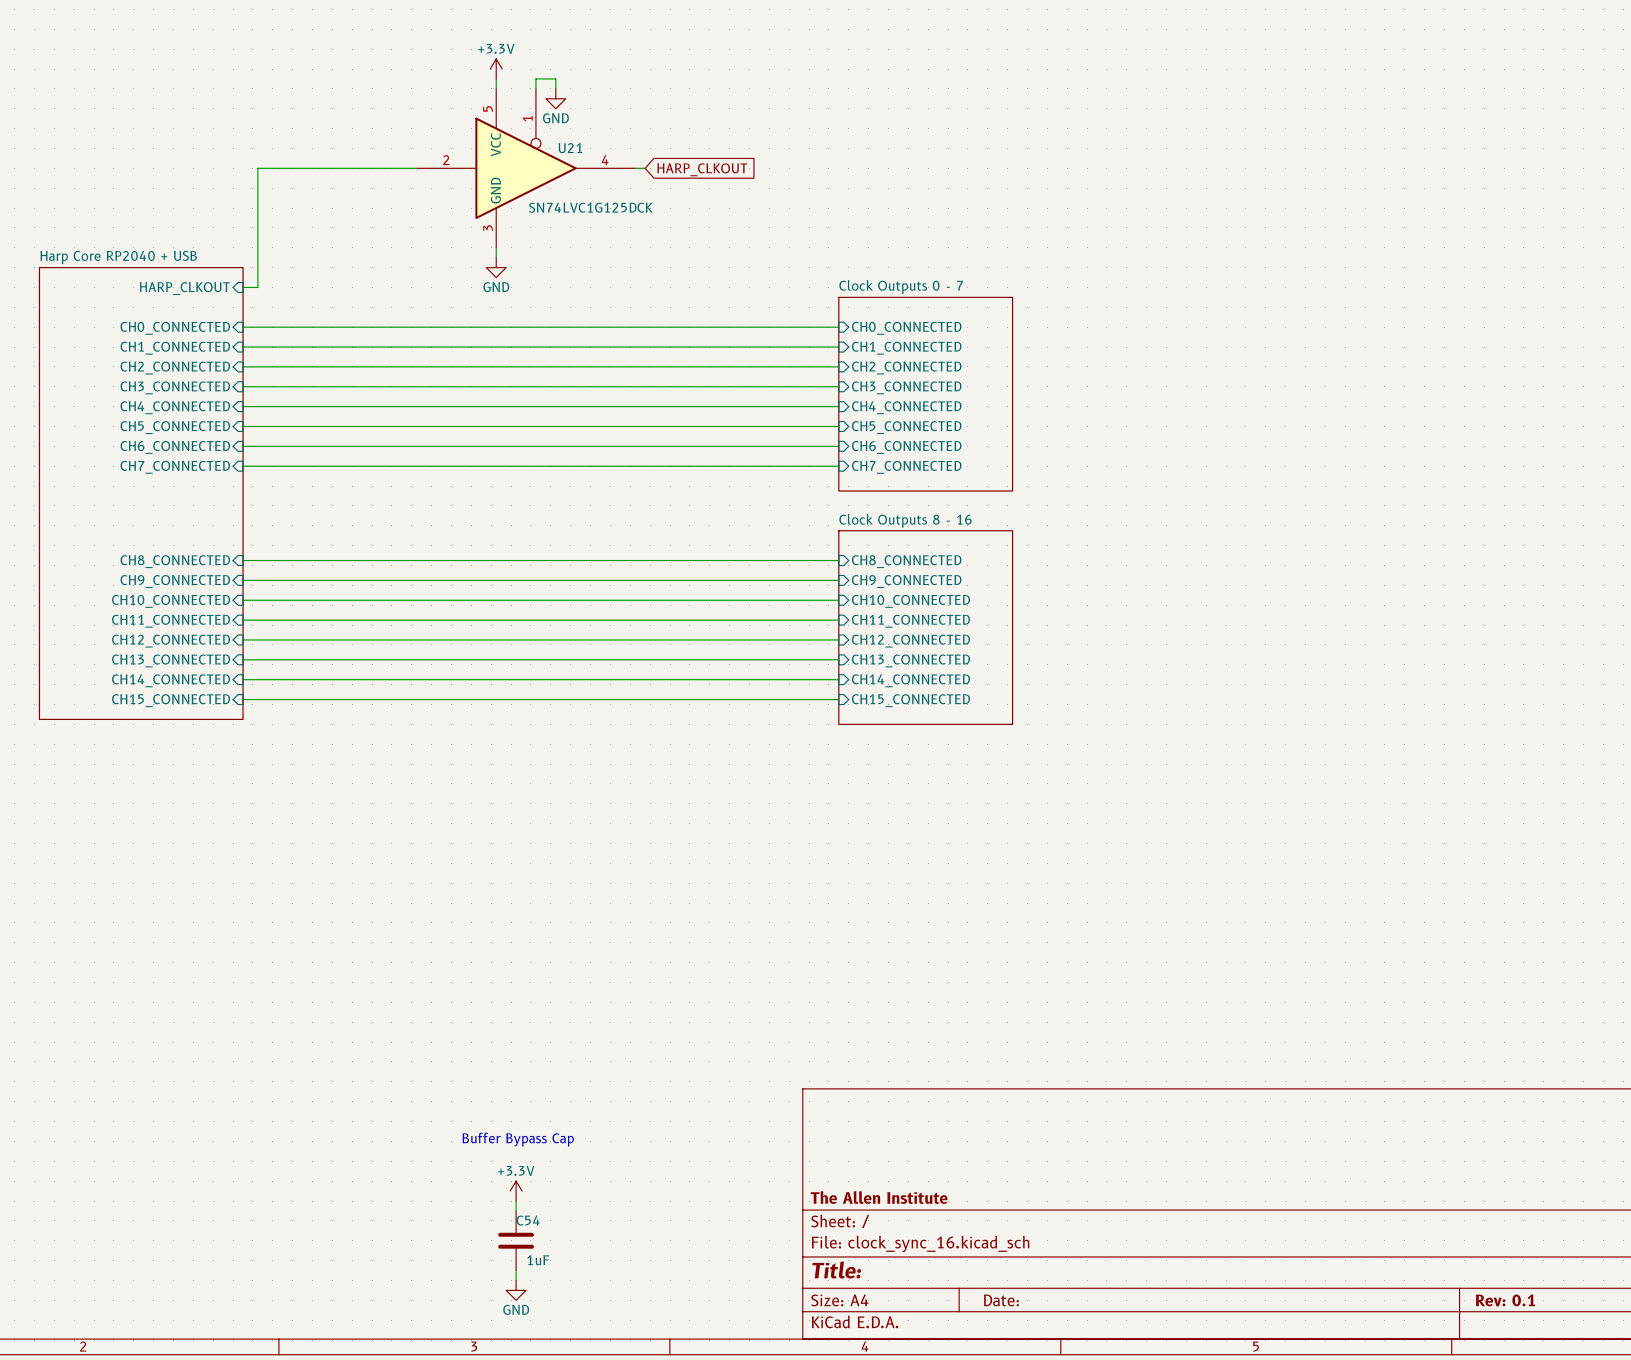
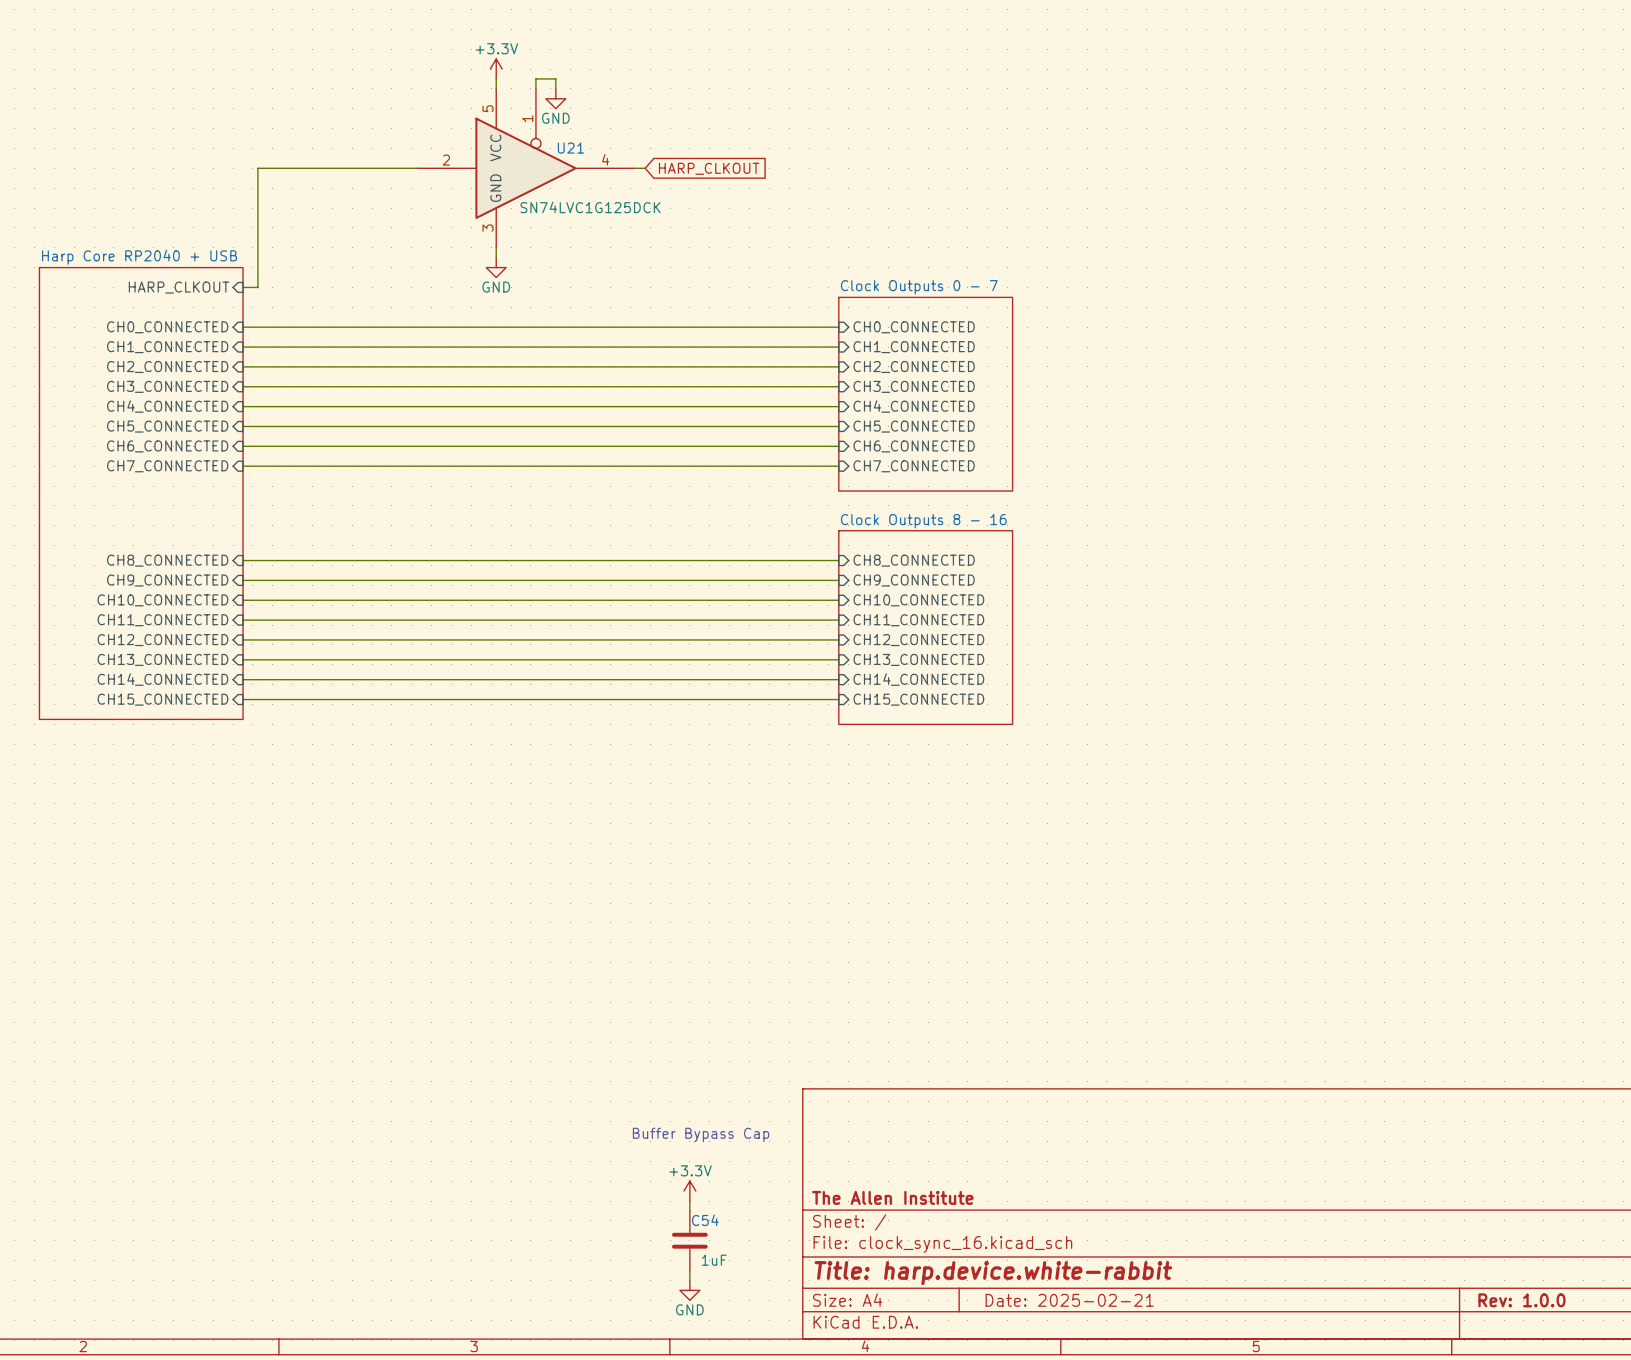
text position: Buffer Bypass Cap (518, 1139) -> Buffer Bypass Cap (701, 1134)
power symbol position: +3.3V (516, 1191) -> +3.3V (689, 1191)
wire: (516, 1201) (516, 1210) -> (689, 1201) (689, 1210)
C54 position: (516, 1240) -> (689, 1240)
wire: (516, 1270) (516, 1280) -> (689, 1270) (689, 1280)
title block: Title: (836, 1270) -> Title: harp.device.white-rabbit (993, 1273)
power symbol position: GND (516, 1290) -> GND (689, 1290)
title block: Date: (1001, 1300) -> Date: 2025-02-21 (1069, 1300)
title block: Rev: 0.1 (1505, 1300) -> Rev: 1.0.0 (1521, 1300)

